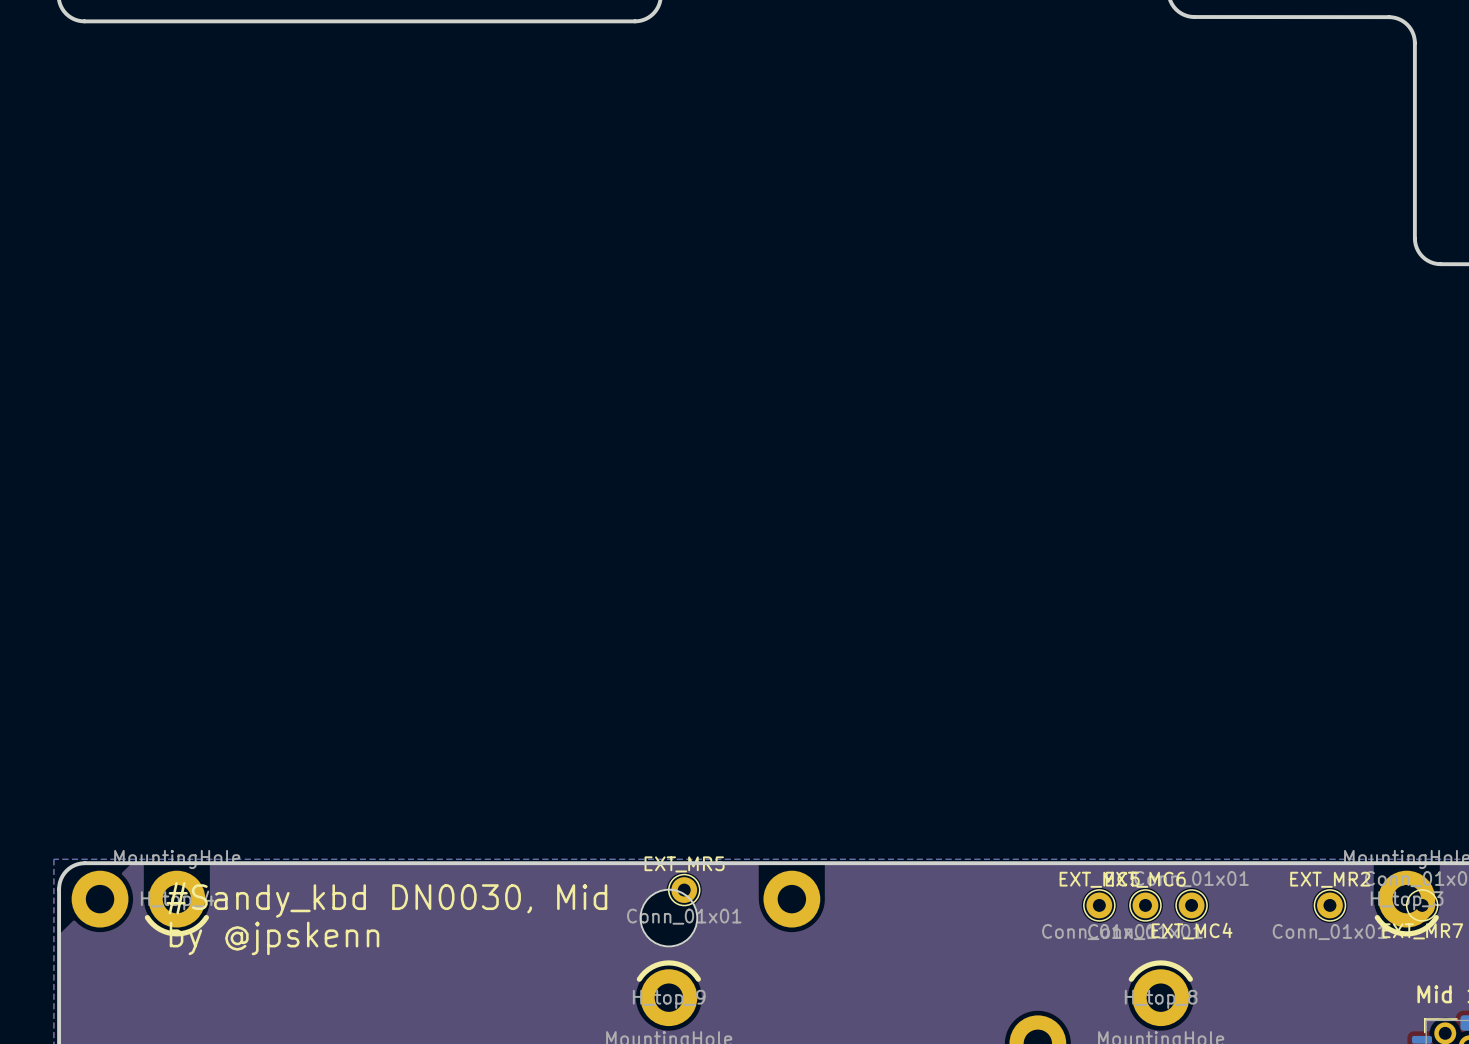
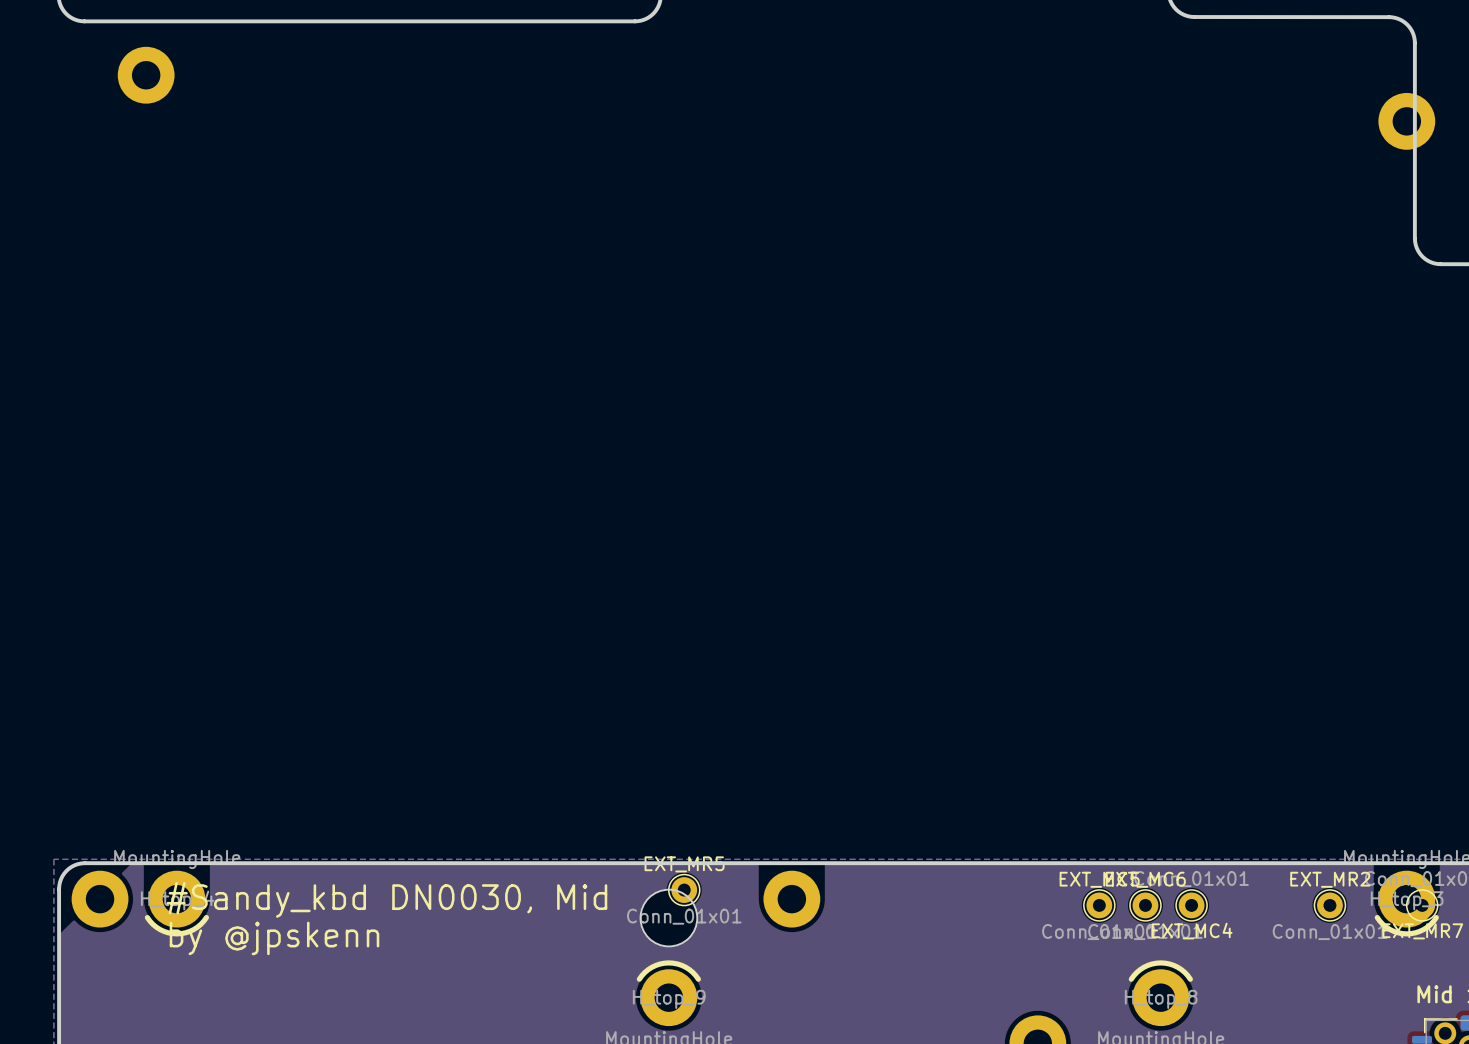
part: none -> (146, 75)
part: none -> (1406, 121)

